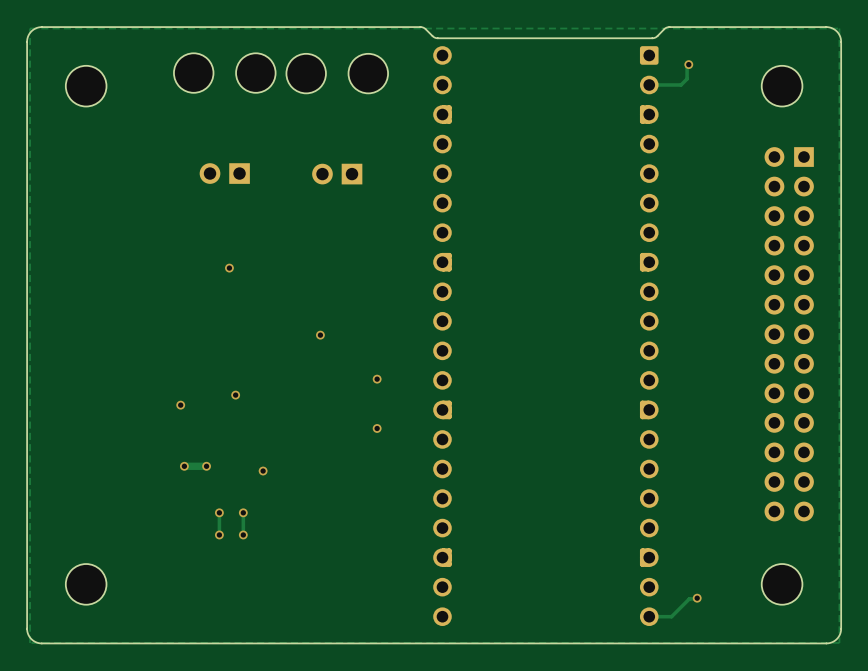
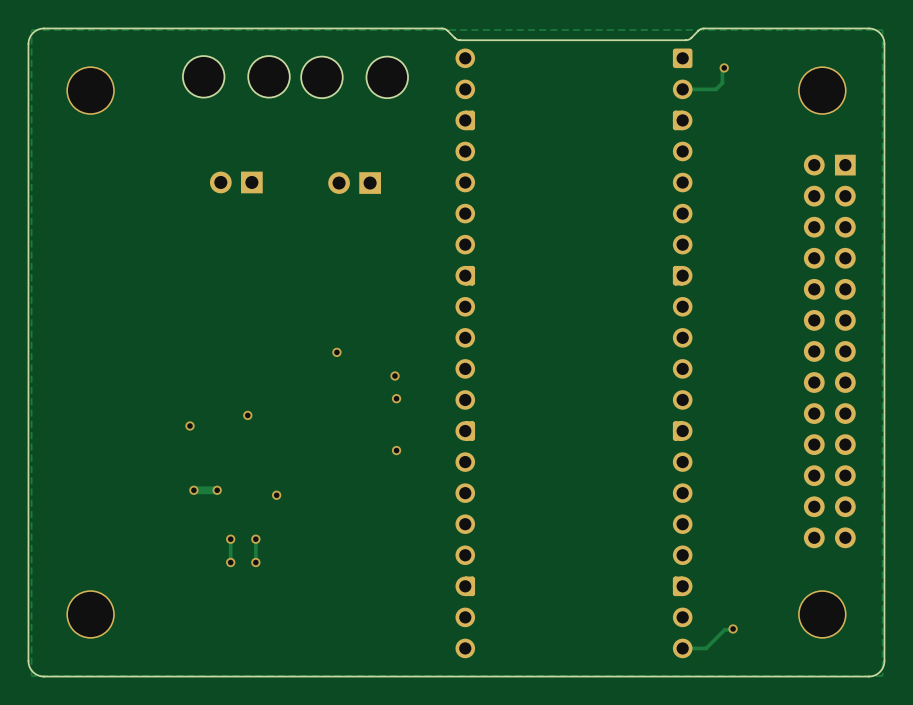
part footprint: [65, 65, 107, 107] -> [66, 66, 115, 115]
part footprint: [761, 65, 803, 107] -> [798, 66, 847, 115]
via: (229, 268) -> none
via: none -> (395, 375)
part footprint: [65, 564, 107, 605] -> [66, 590, 115, 639]
part footprint: [761, 564, 803, 605] -> [798, 590, 847, 639]

